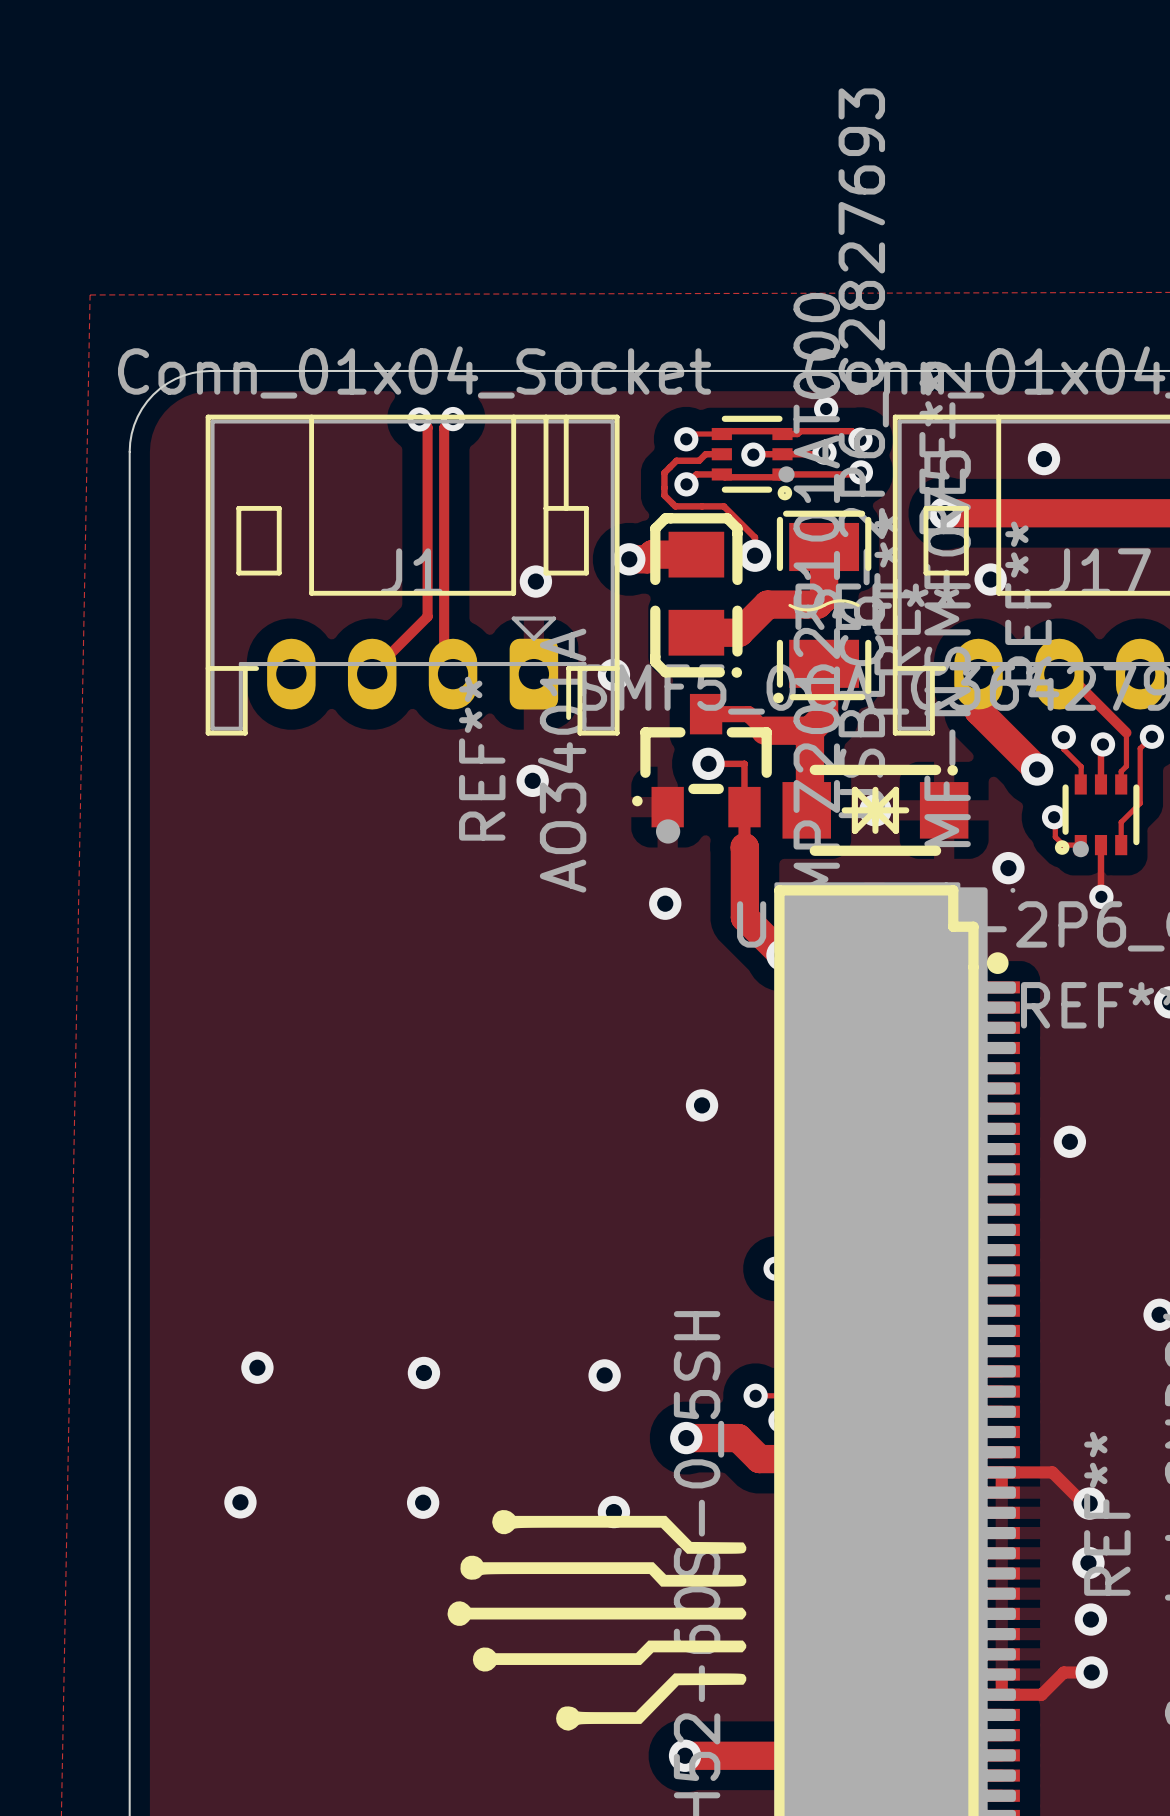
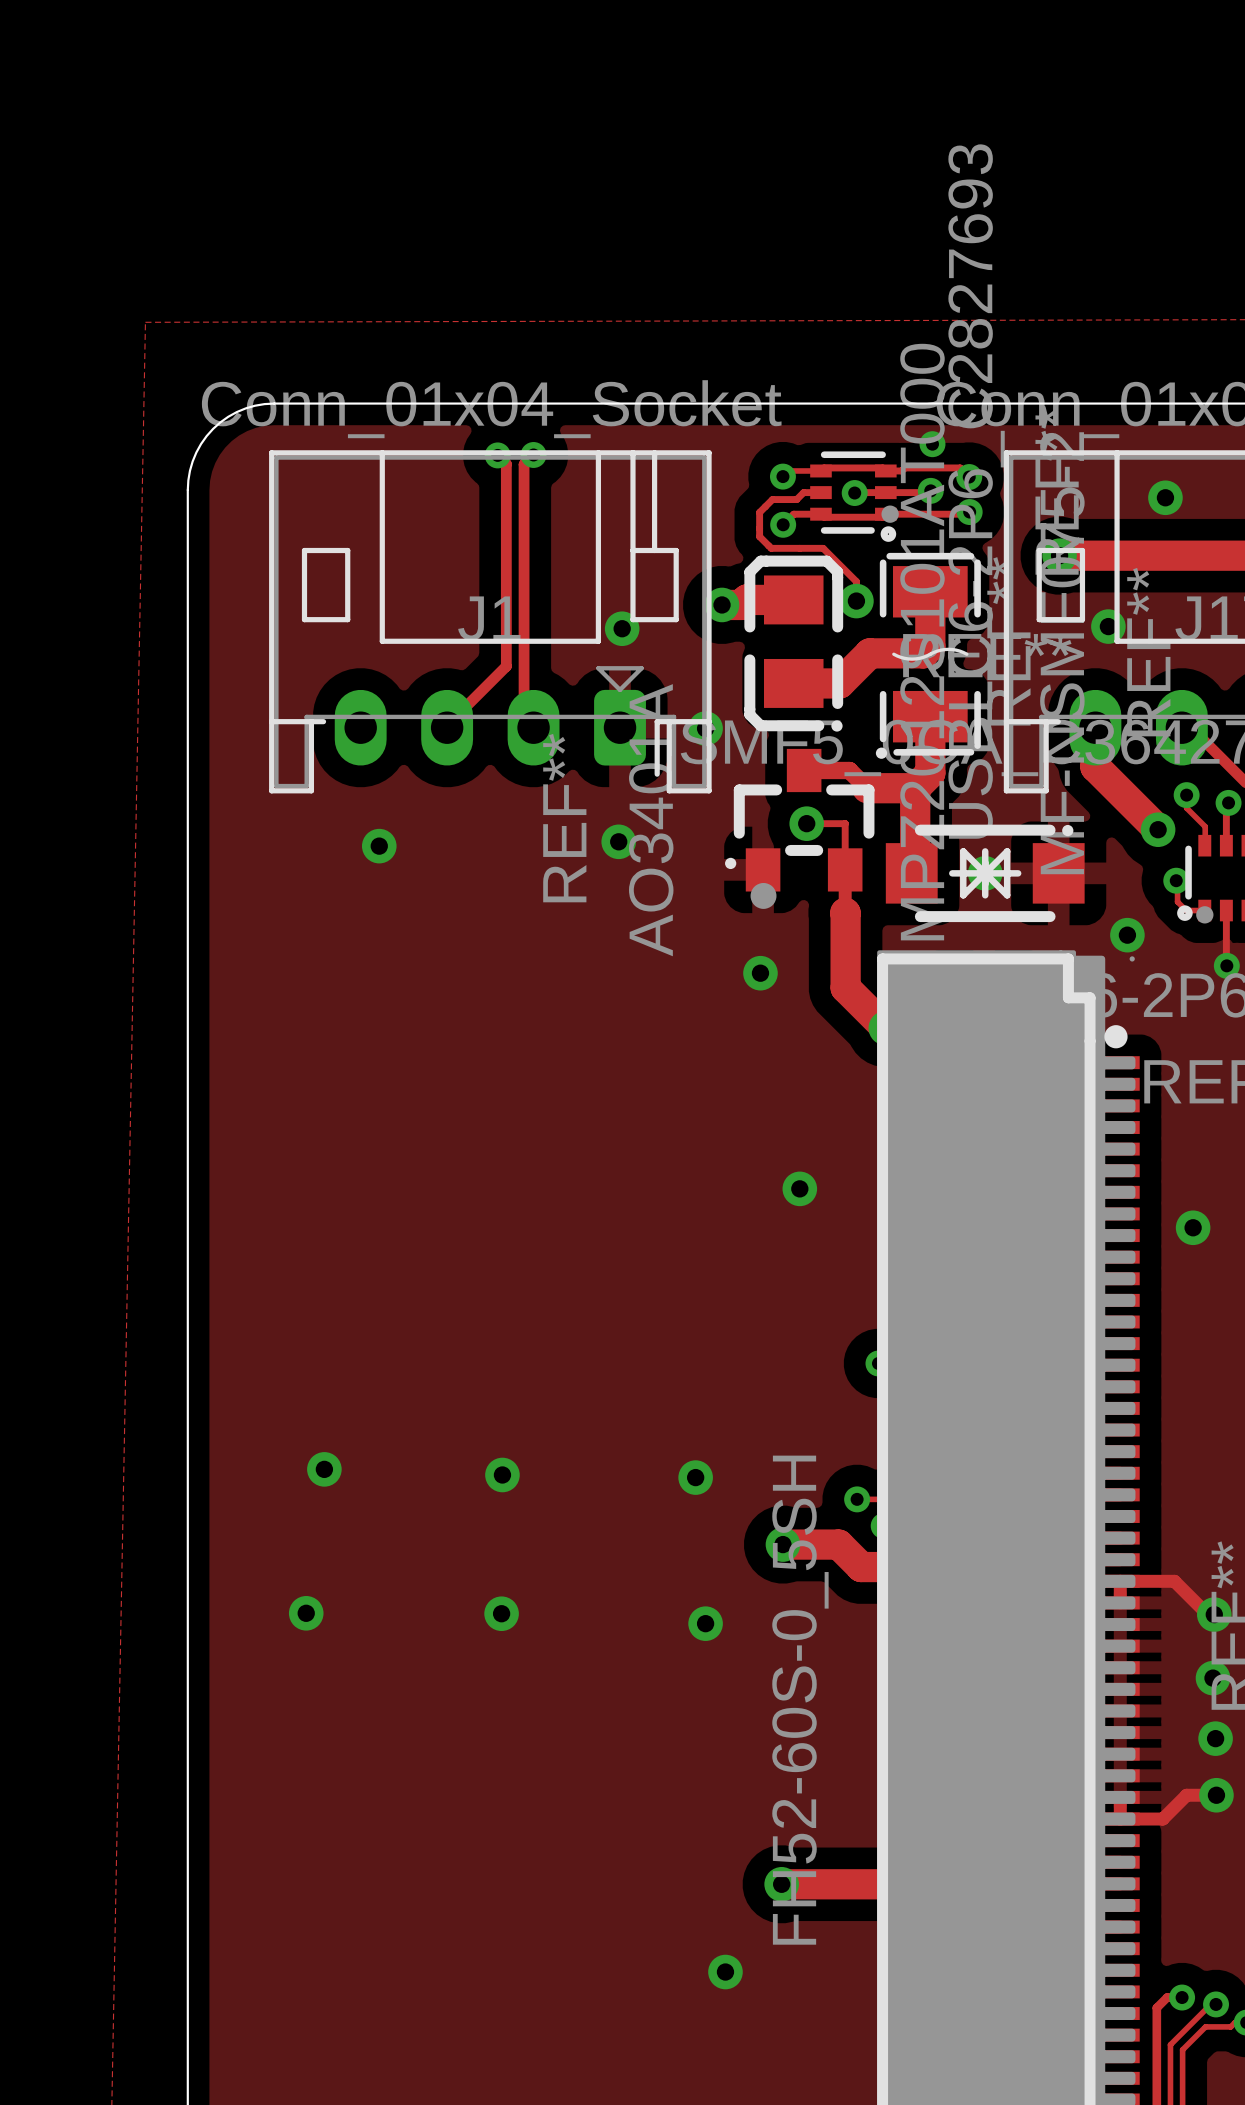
via: none -> (379, 846)
drawing: [447, 1510, 747, 1731] -> none

